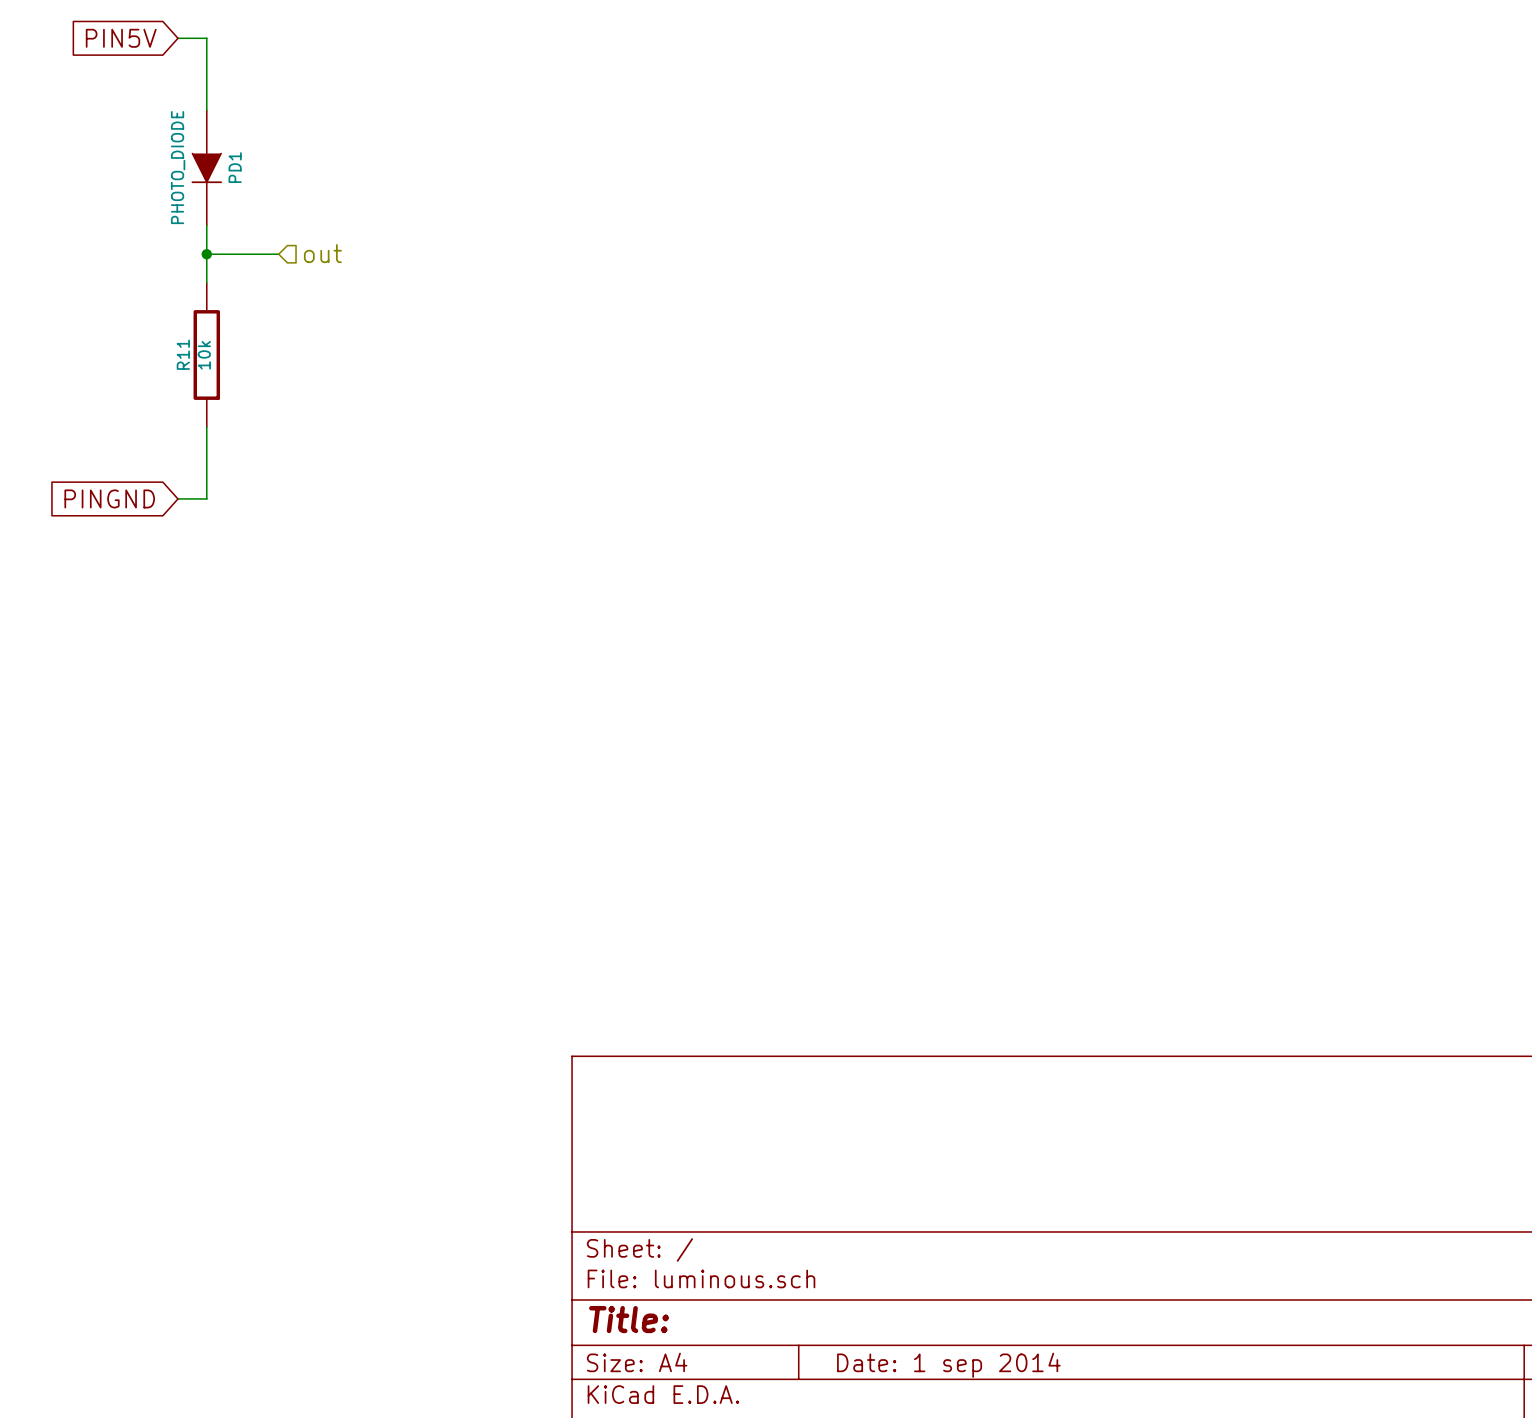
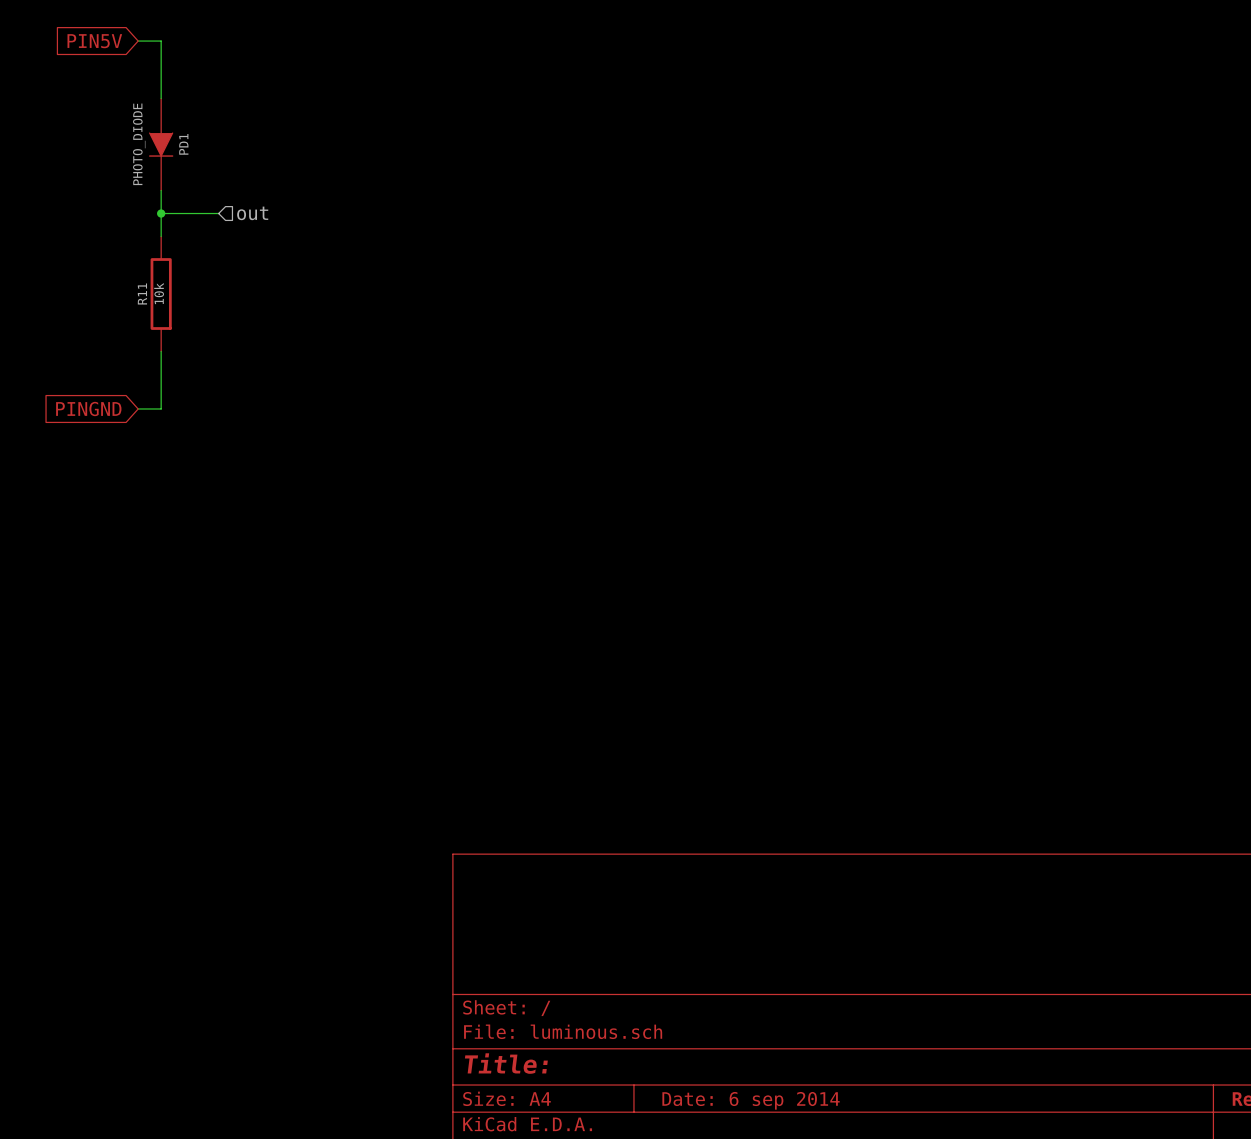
title block: Date: 1 sep 2014 (948, 1365) -> Date: 6 sep 2014 (751, 1100)

